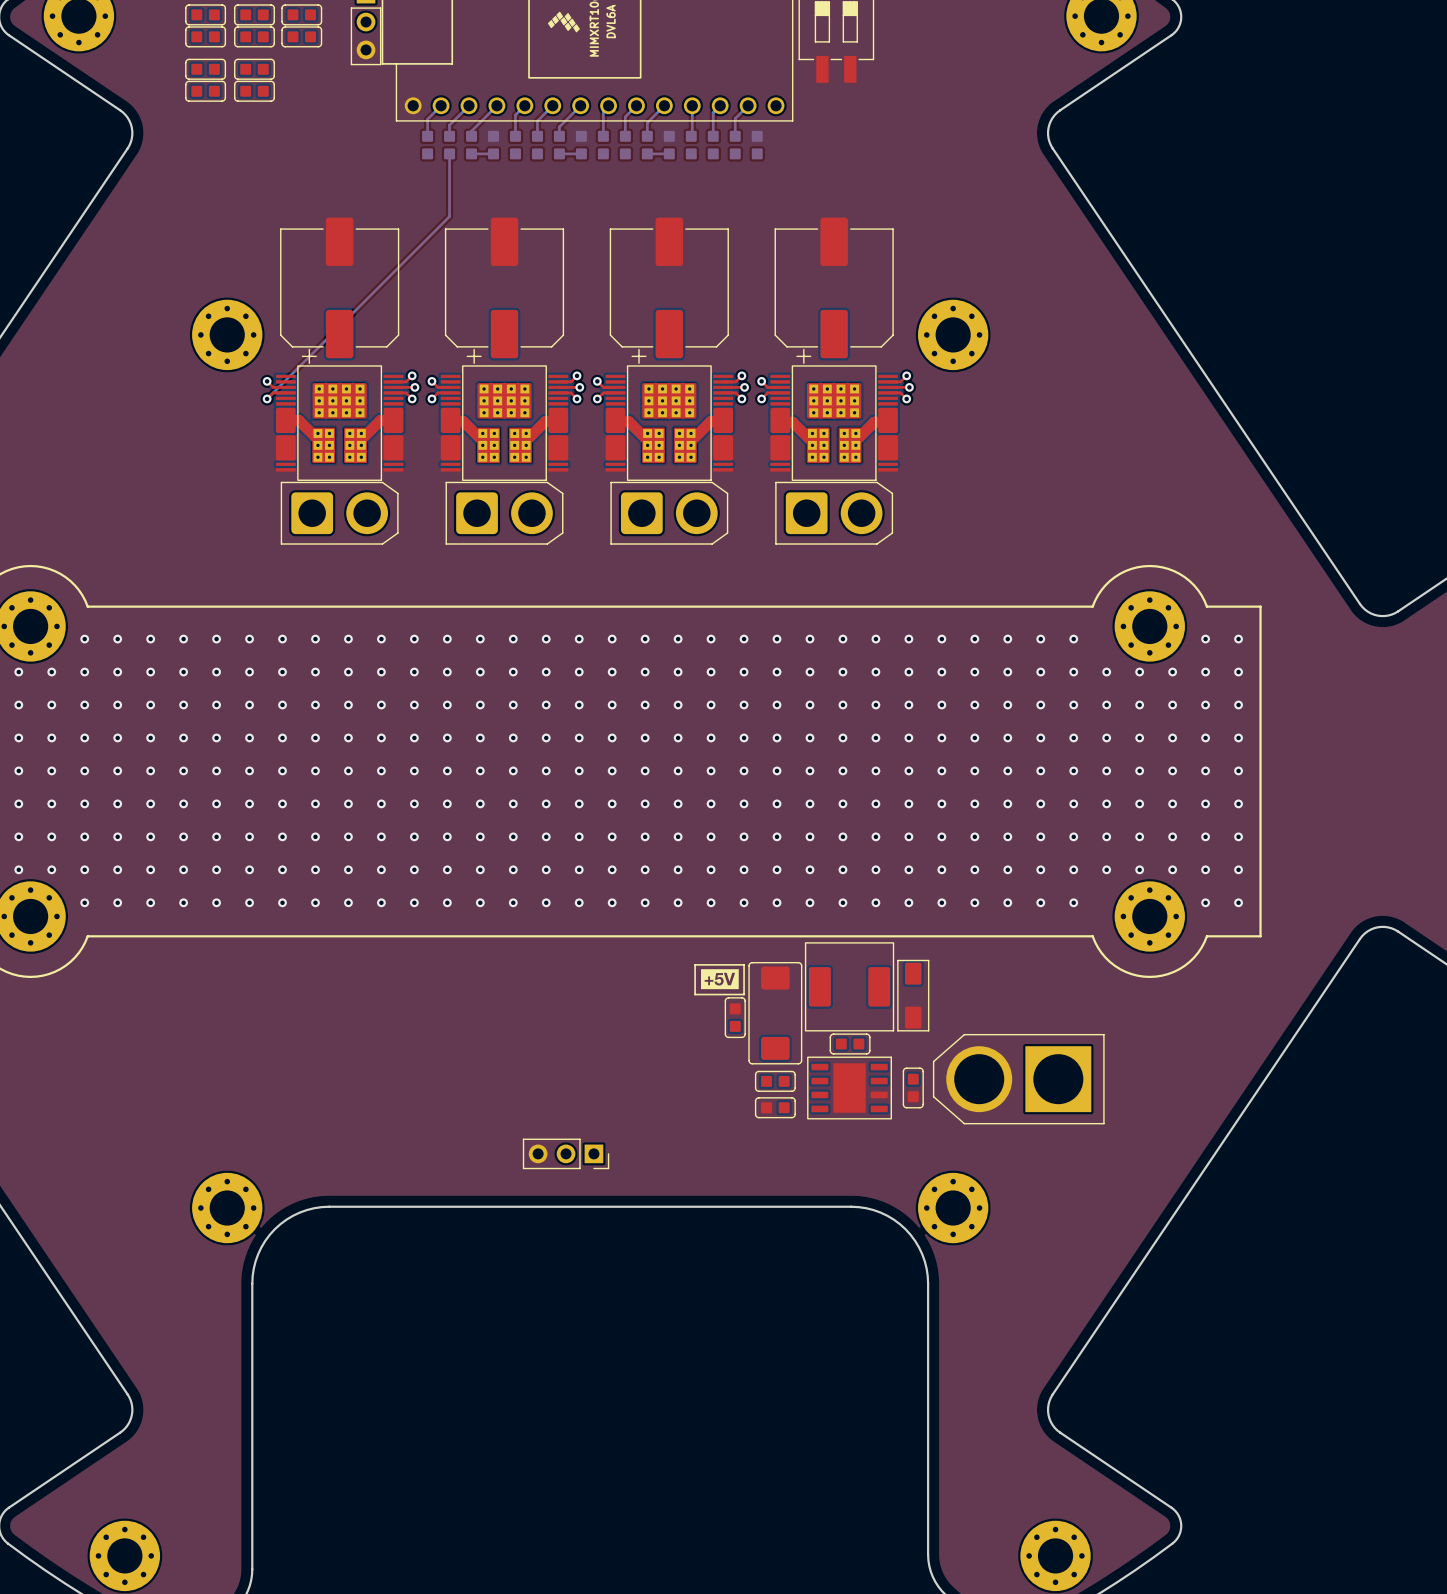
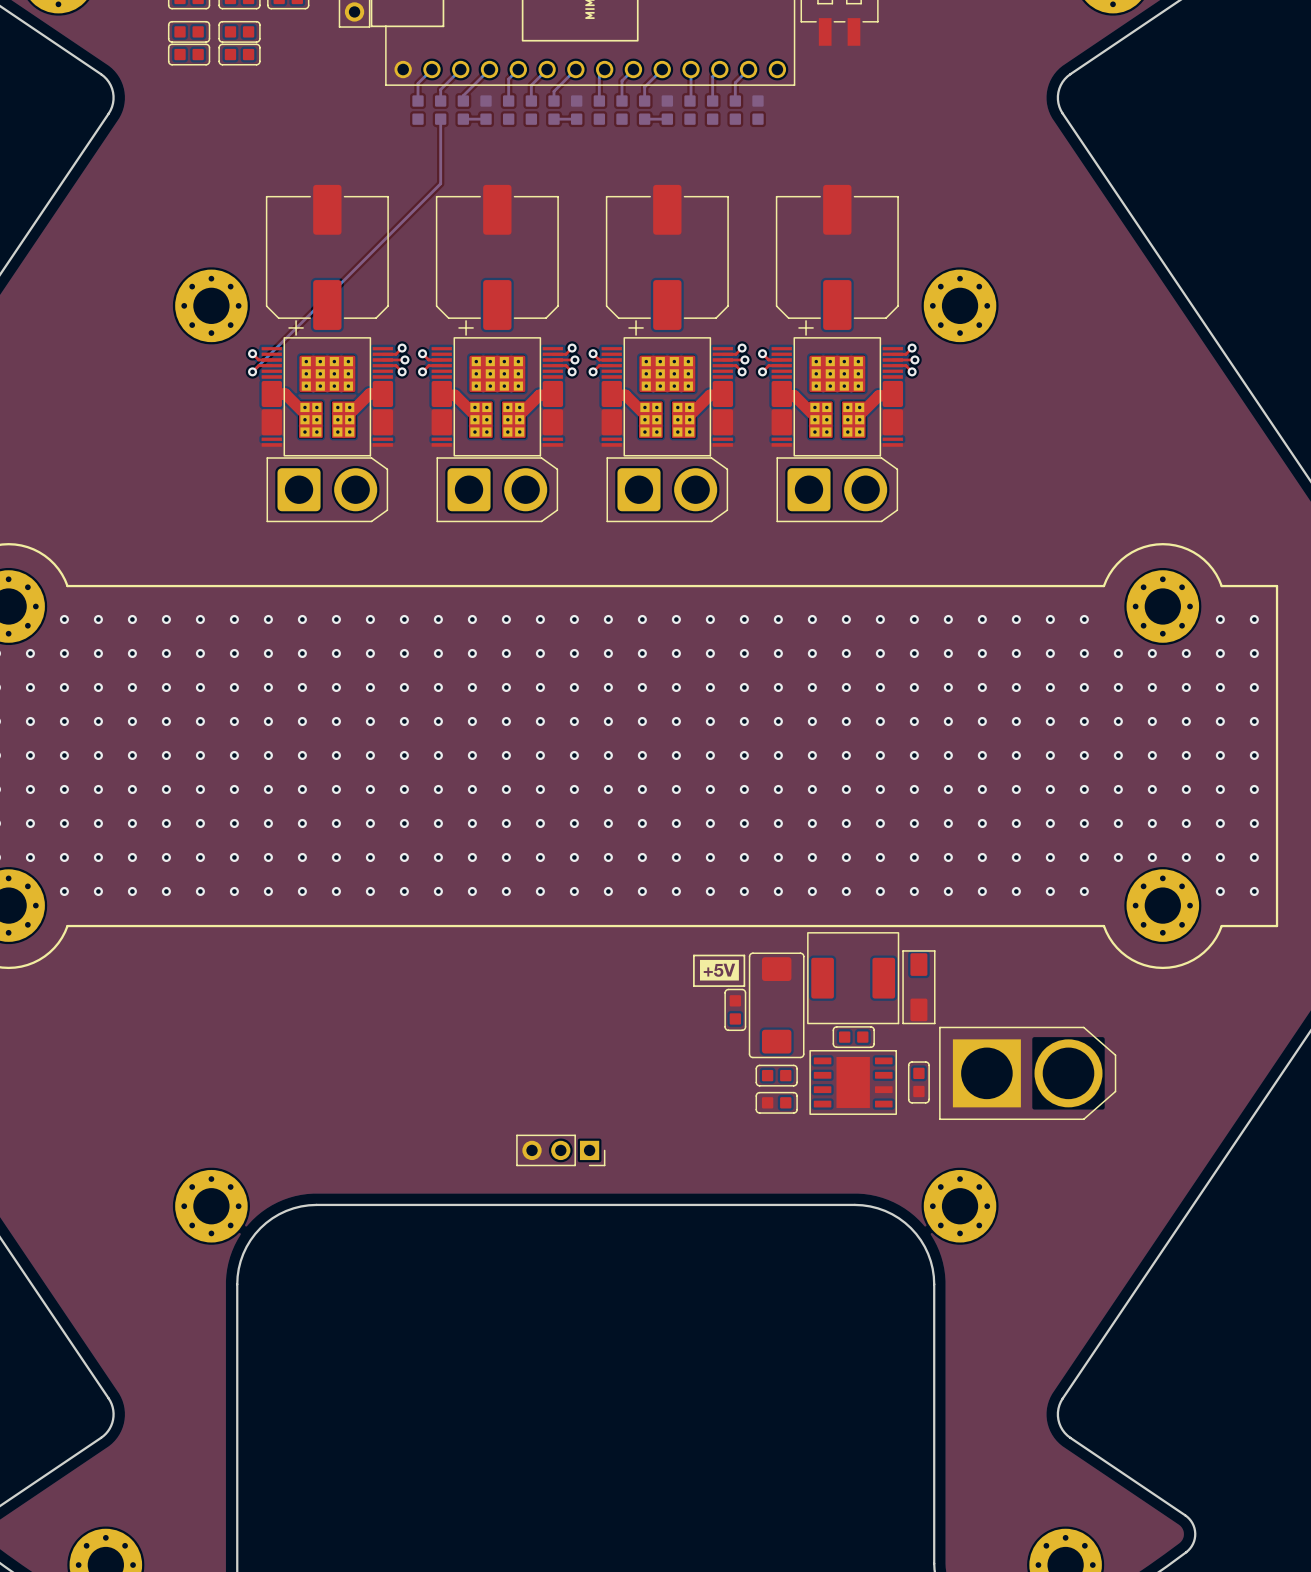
part rotation: 0° (1018, 1079) -> 180° (1027, 1073)

